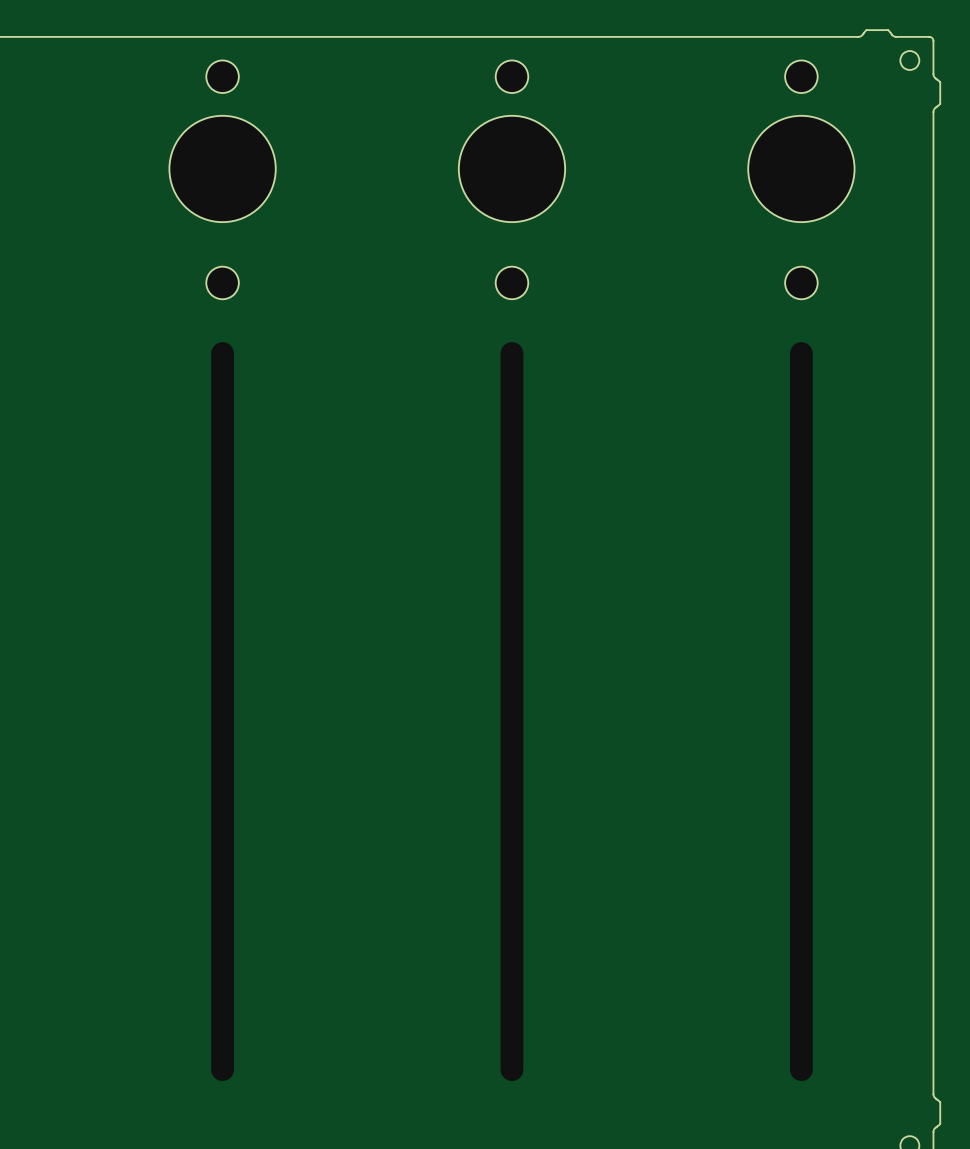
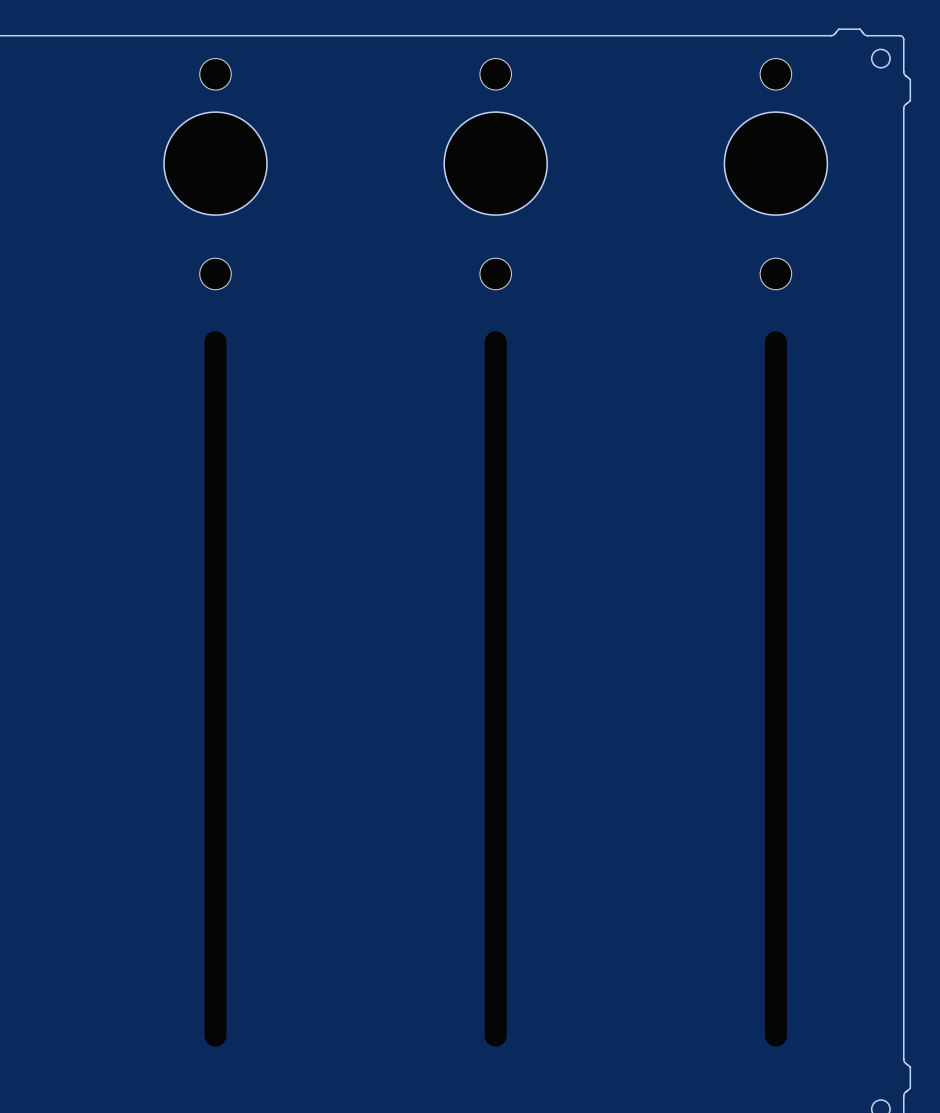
part footprint: [206, 60, 239, 94] -> [199, 58, 232, 91]
part footprint: [495, 60, 529, 94] -> [479, 58, 512, 91]
part footprint: [785, 60, 818, 94] -> [759, 58, 793, 91]
part footprint: [206, 266, 239, 300] -> [199, 257, 232, 291]
part footprint: [495, 266, 529, 300] -> [479, 257, 512, 291]
part footprint: [785, 266, 818, 300] -> [759, 257, 793, 291]

